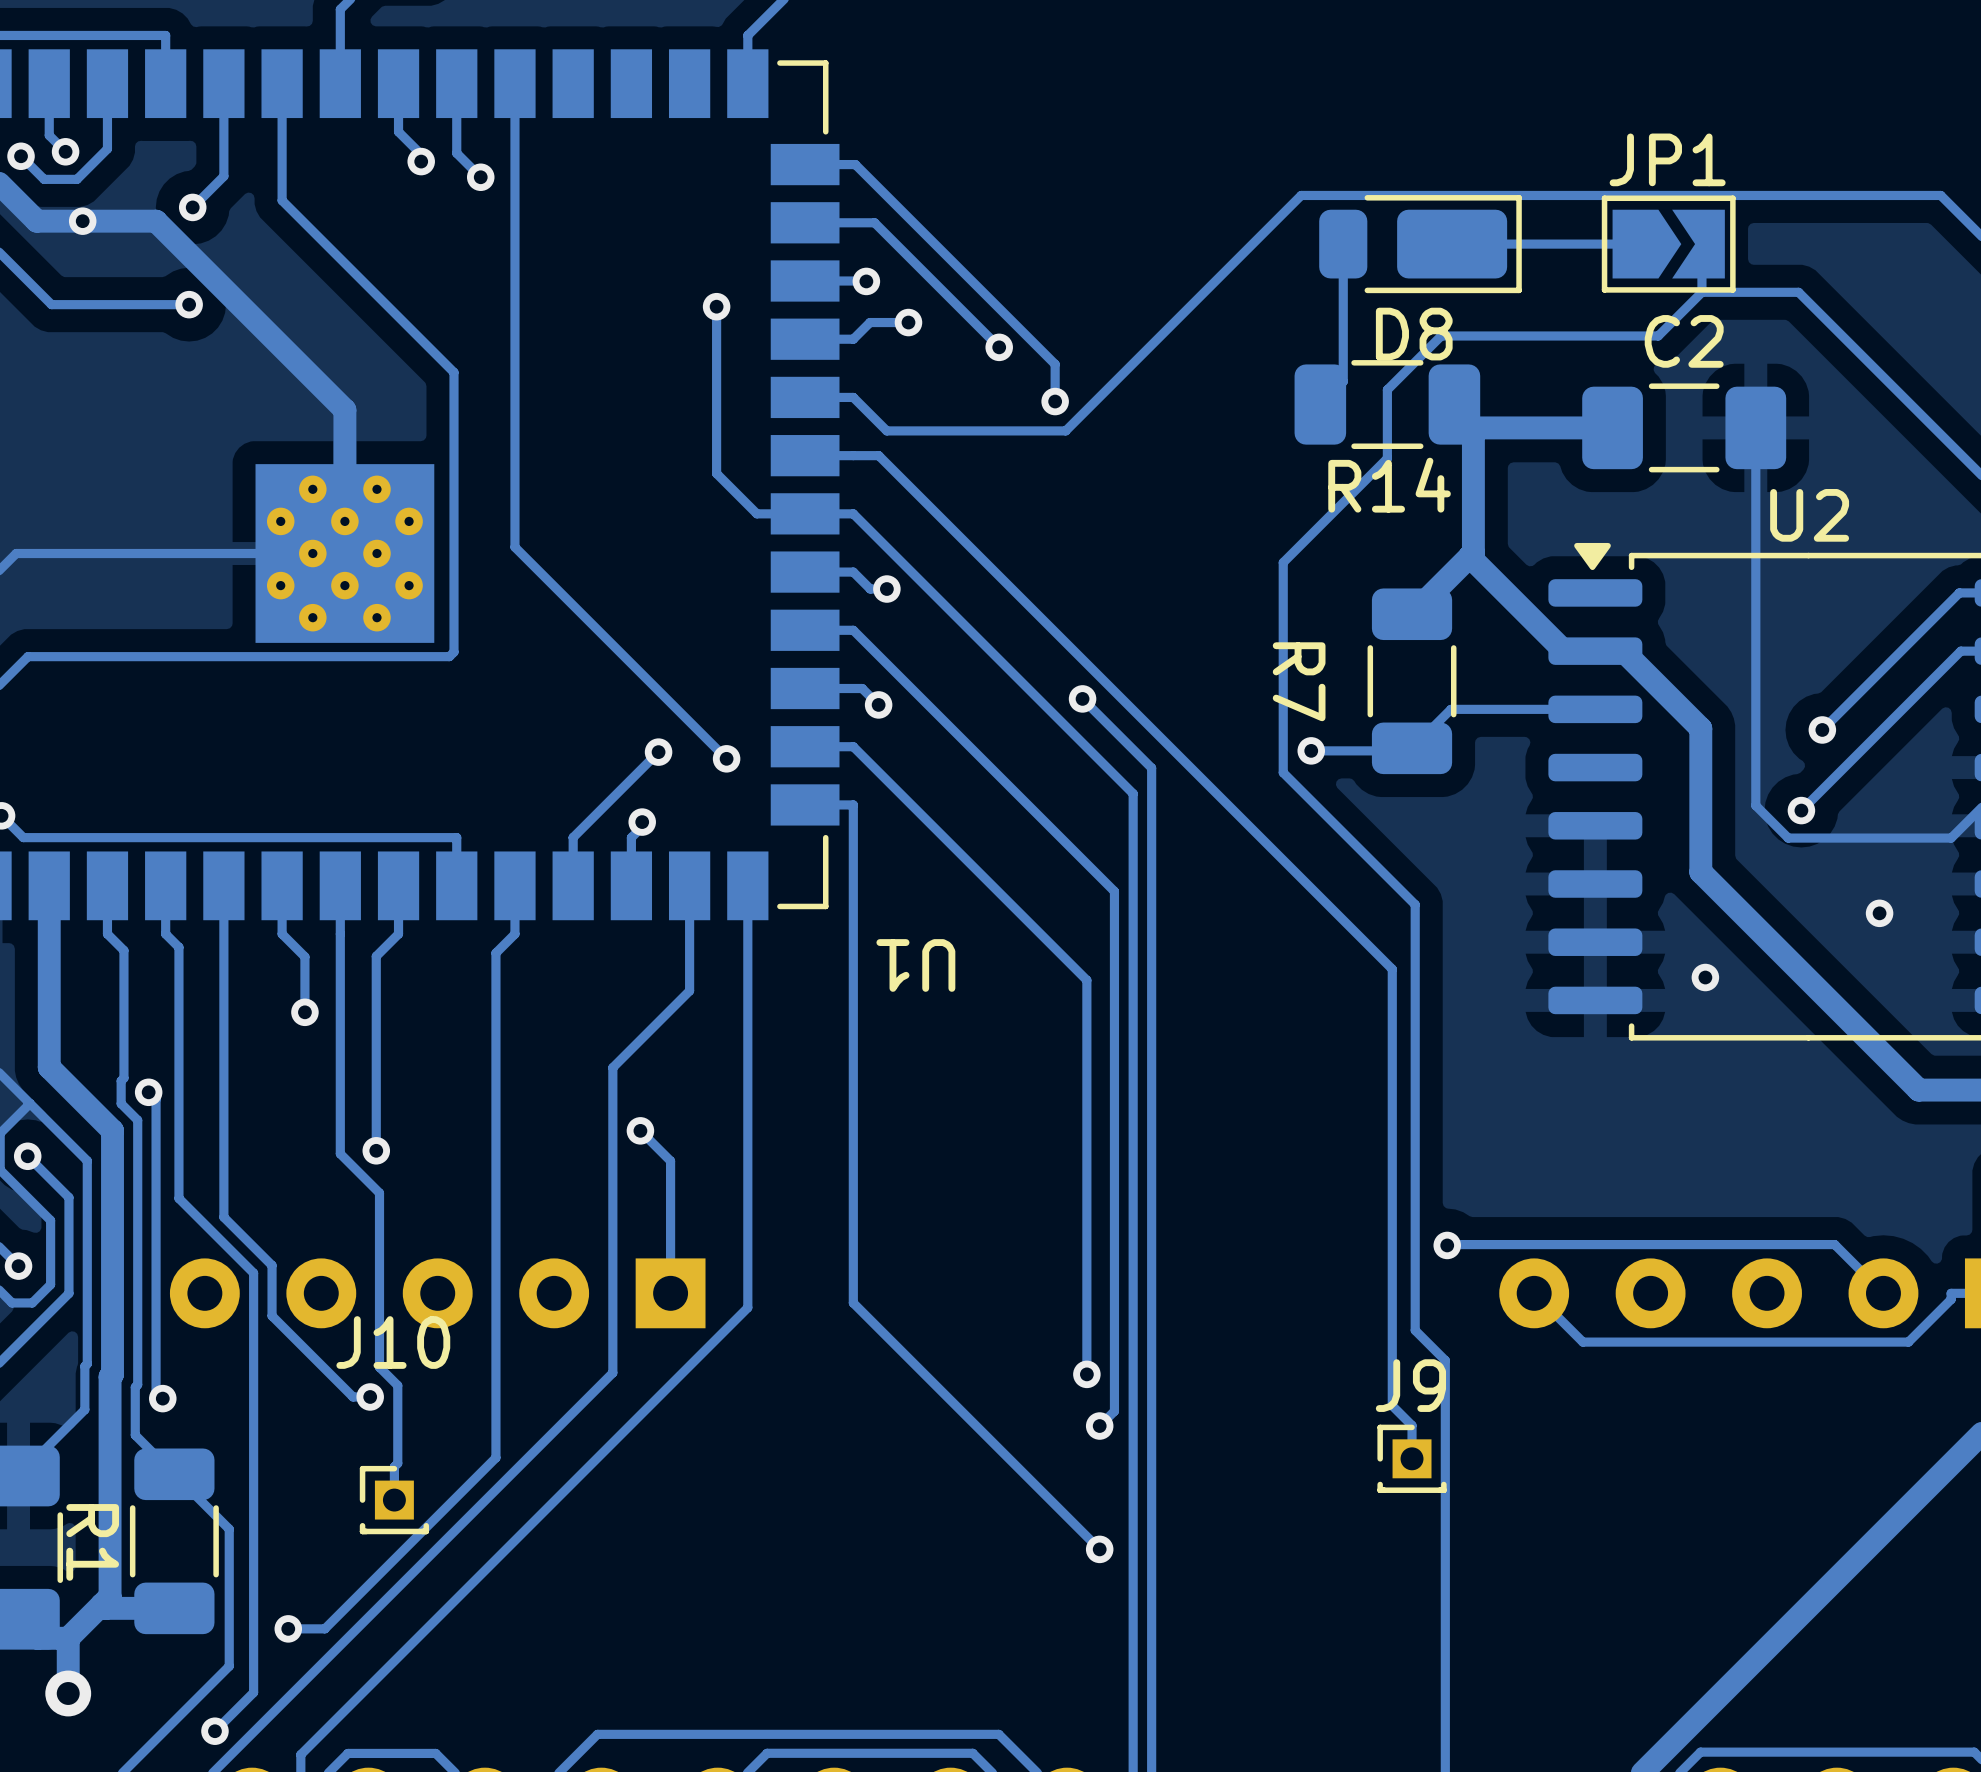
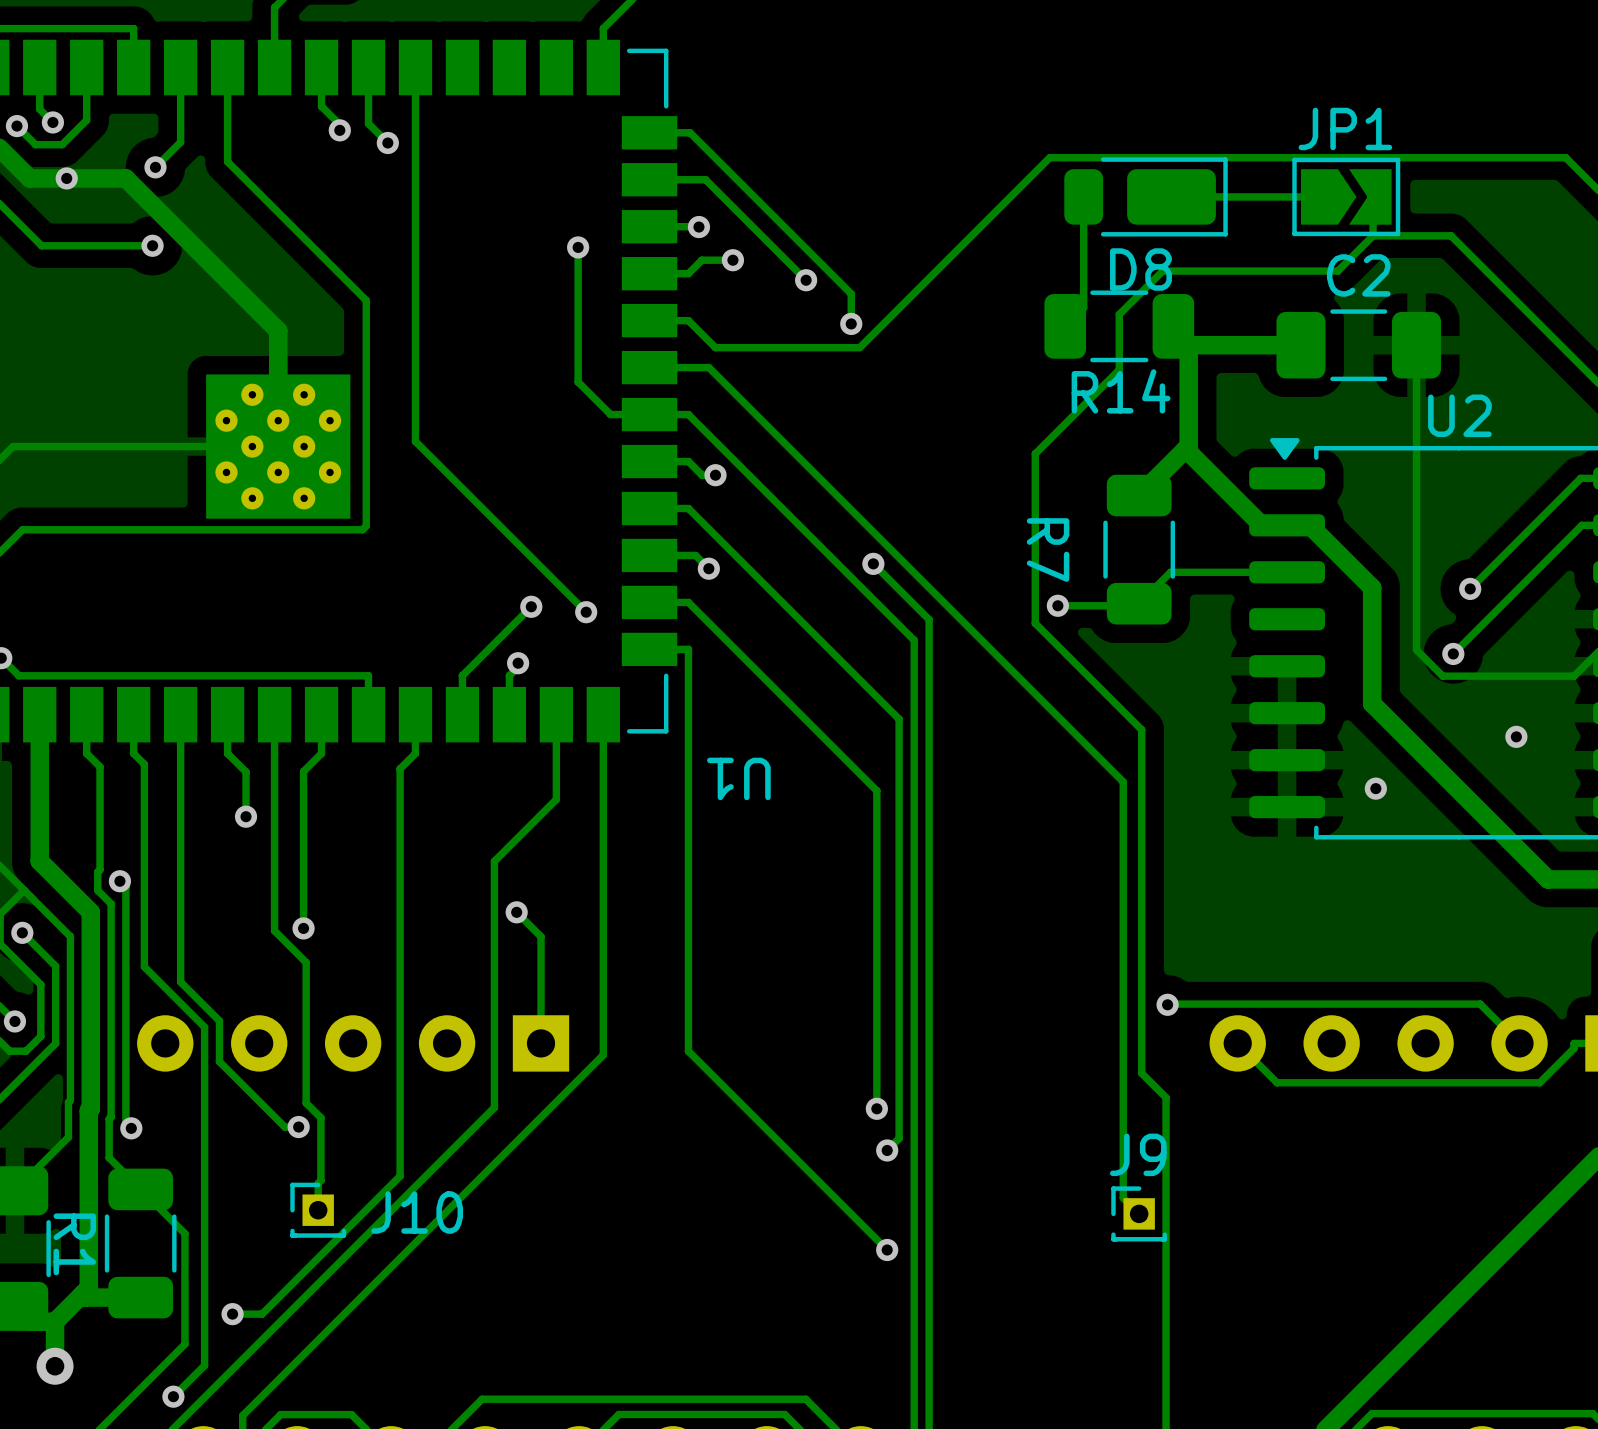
J10 name position: J10 (393, 1342) -> J10 (417, 1212)
track: (1392, 1405) (1412, 1425) (1412, 1458) -> (1123, 1134) (1123, 1197) (1139, 1213)
J9 position: (1412, 1458) -> (1139, 1213)

